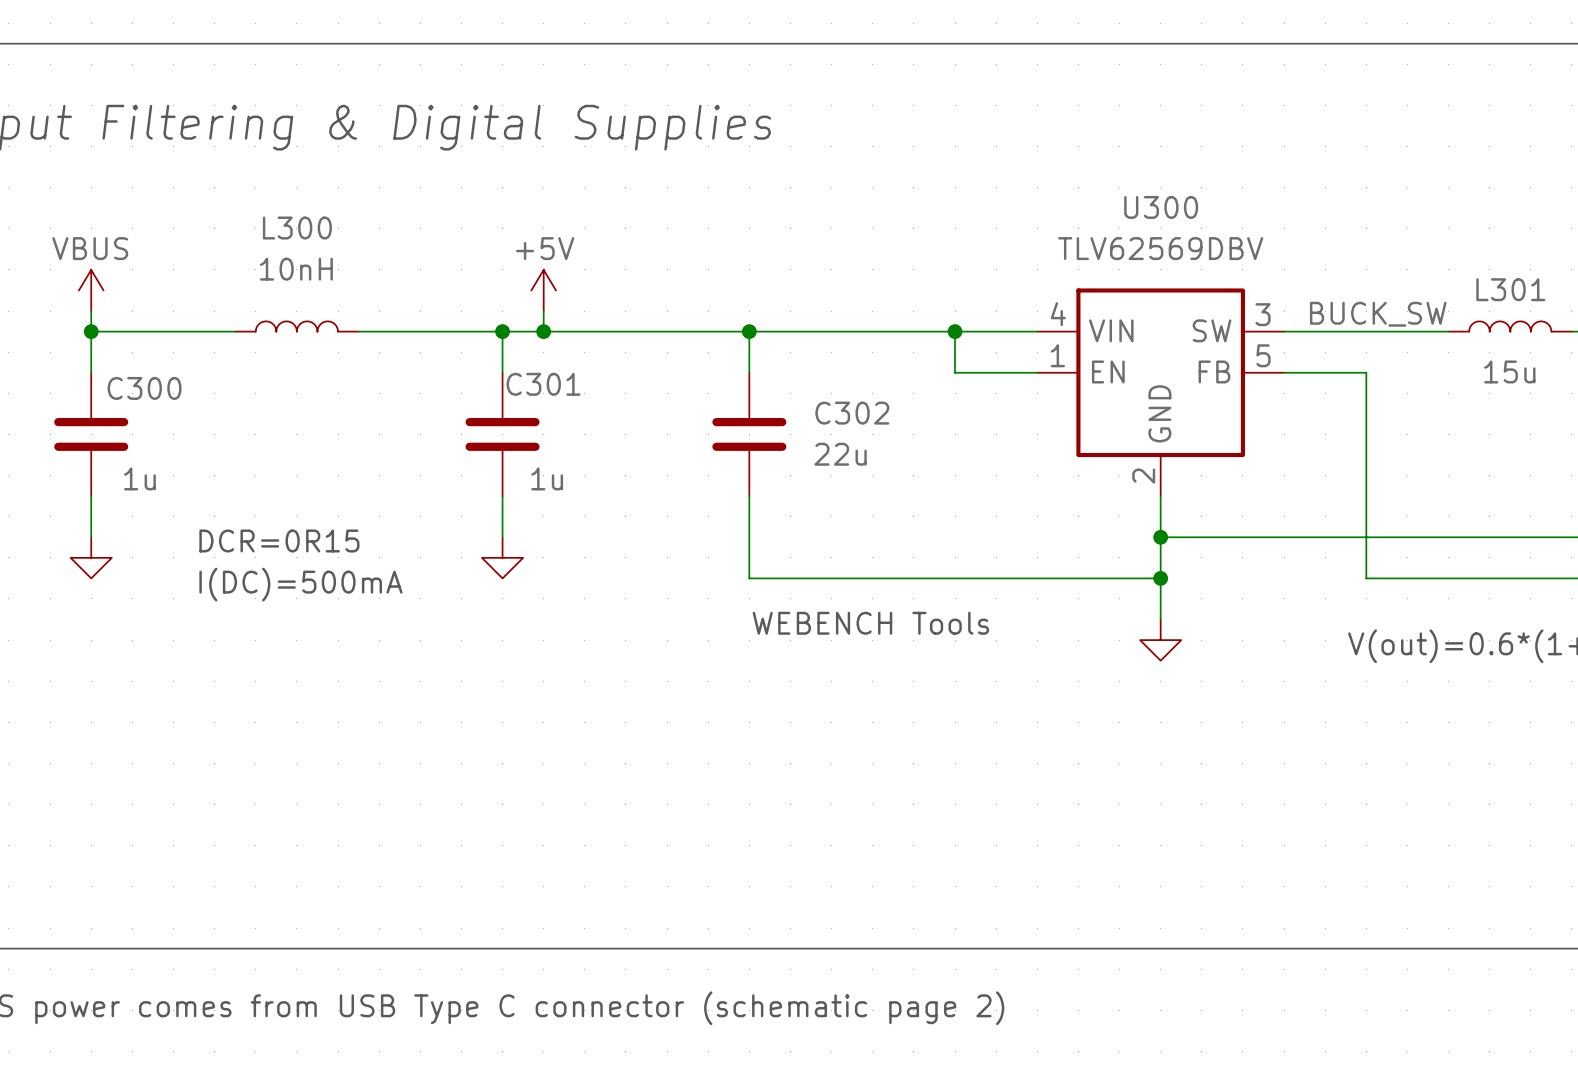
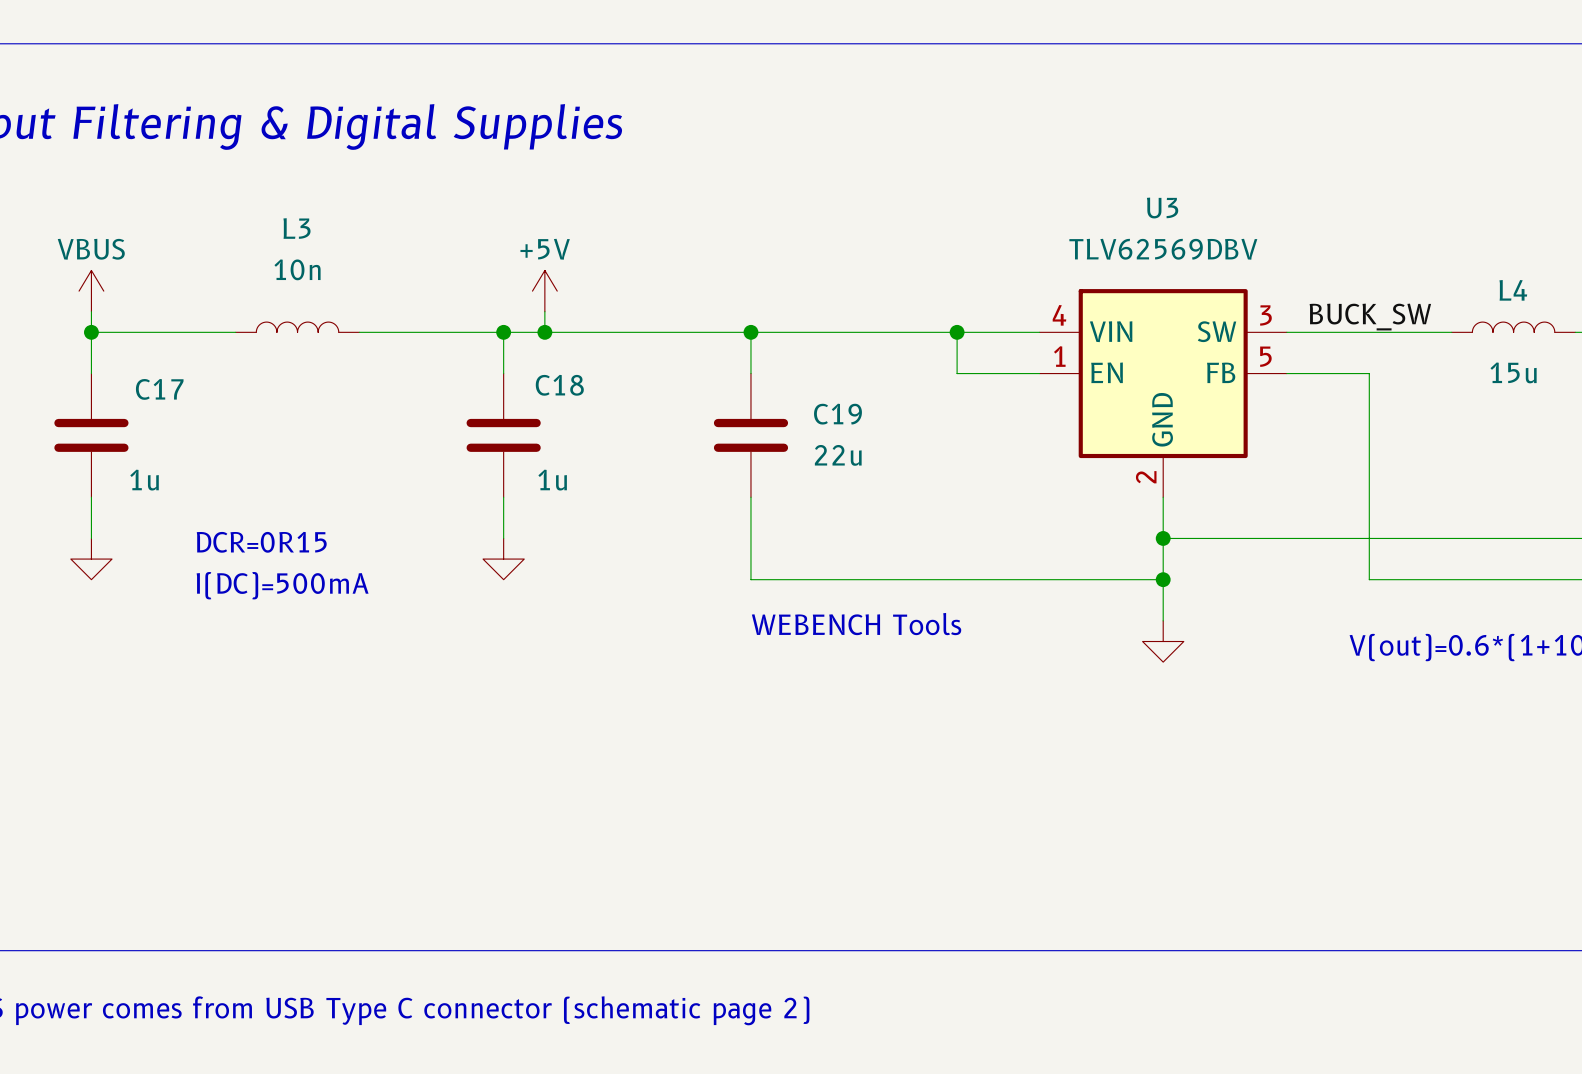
U300 name: U300 (1161, 207) -> U3 (1162, 208)
L300 name: L300 (297, 228) -> L3 (296, 228)
L300 value: 10nH (296, 269) -> 10n (297, 269)
L301 name: L301 (1510, 289) -> L4 (1513, 290)
C301 name: C301 (543, 384) -> C18 (559, 385)
C300 name: C300 (144, 388) -> C17 (159, 389)
C302 name: C302 (852, 413) -> C19 (837, 414)

